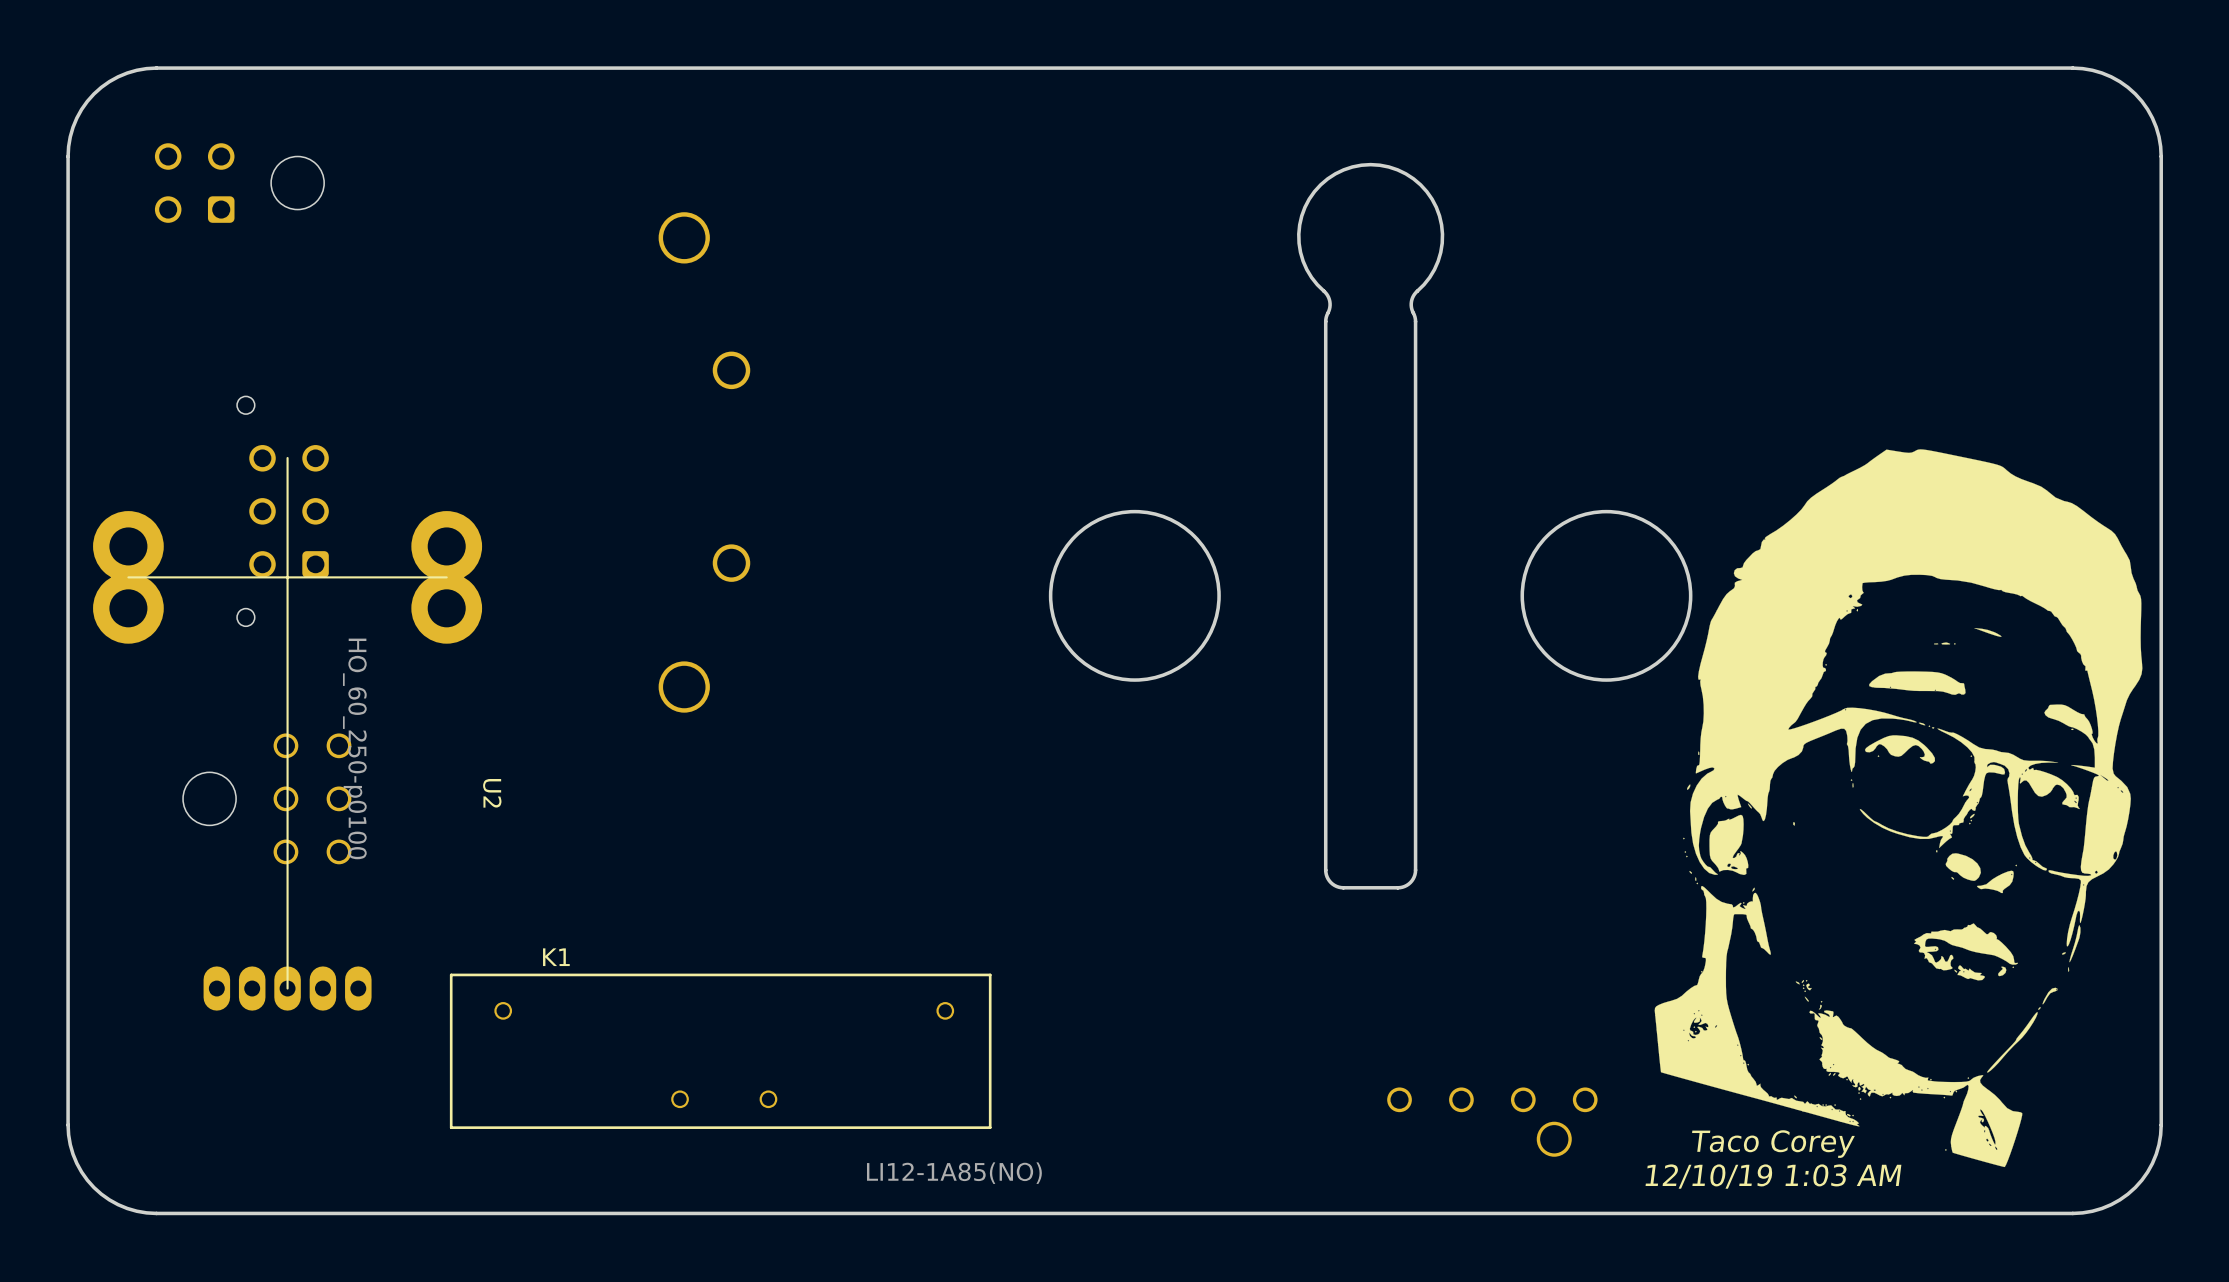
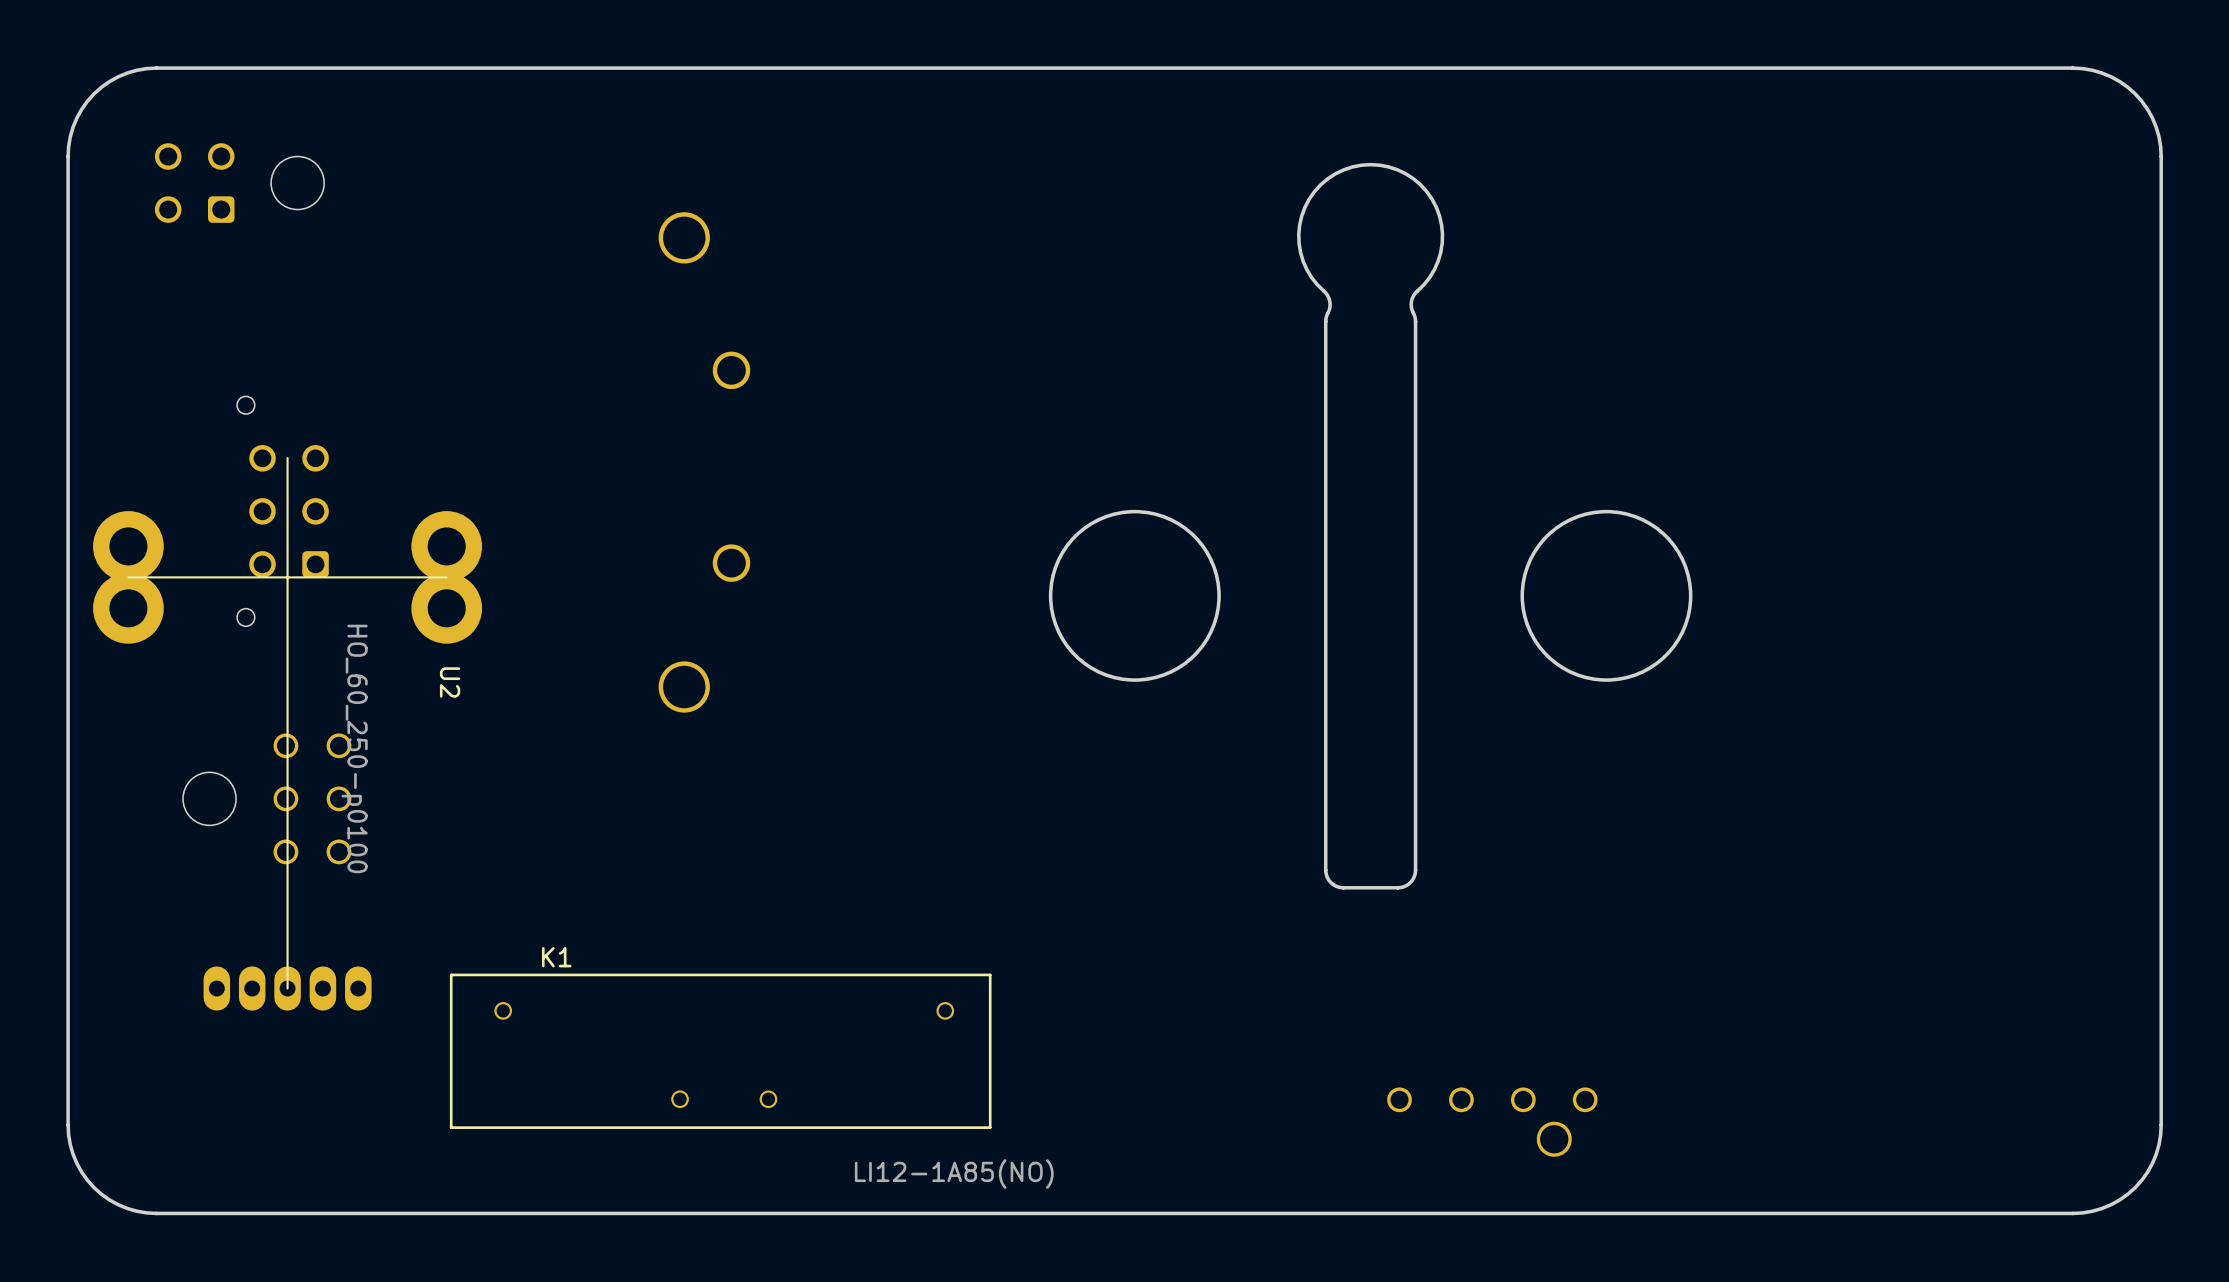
drawing: [1654, 449, 2143, 1168] -> none
U2 name position: U2 (492, 793) -> U2 (450, 682)
text: Taco Corey (1773, 1144) -> none
text: 12/10/19 1:03 AM (1773, 1176) -> none

